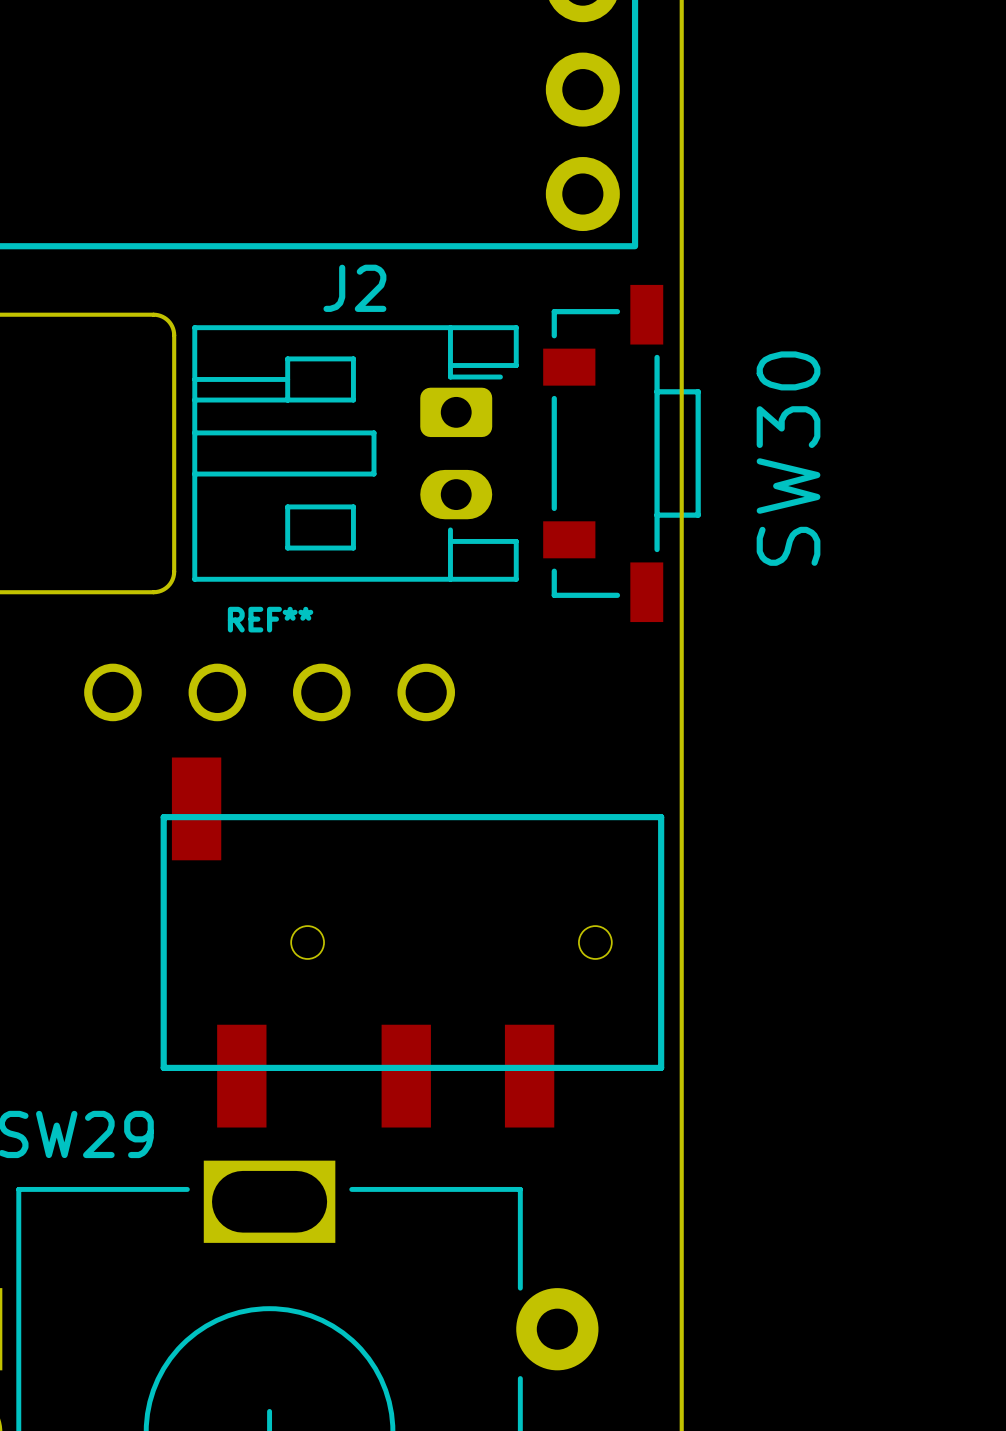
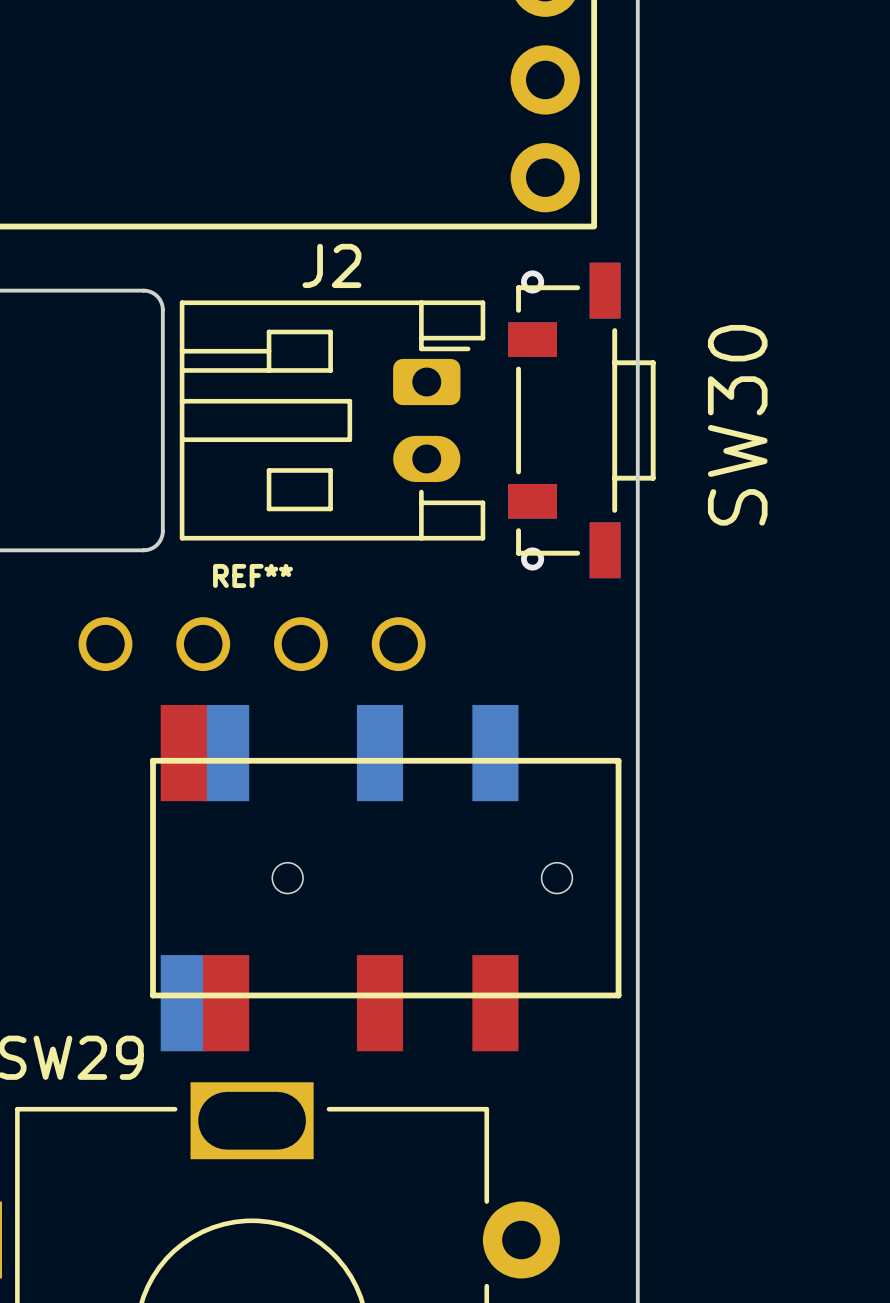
SW30 footprint: [543, 284, 701, 623] -> [508, 262, 656, 579]
via: none -> (532, 281)
via: none -> (532, 558)
part footprint: [160, 757, 665, 1128] -> [150, 704, 622, 1052]

